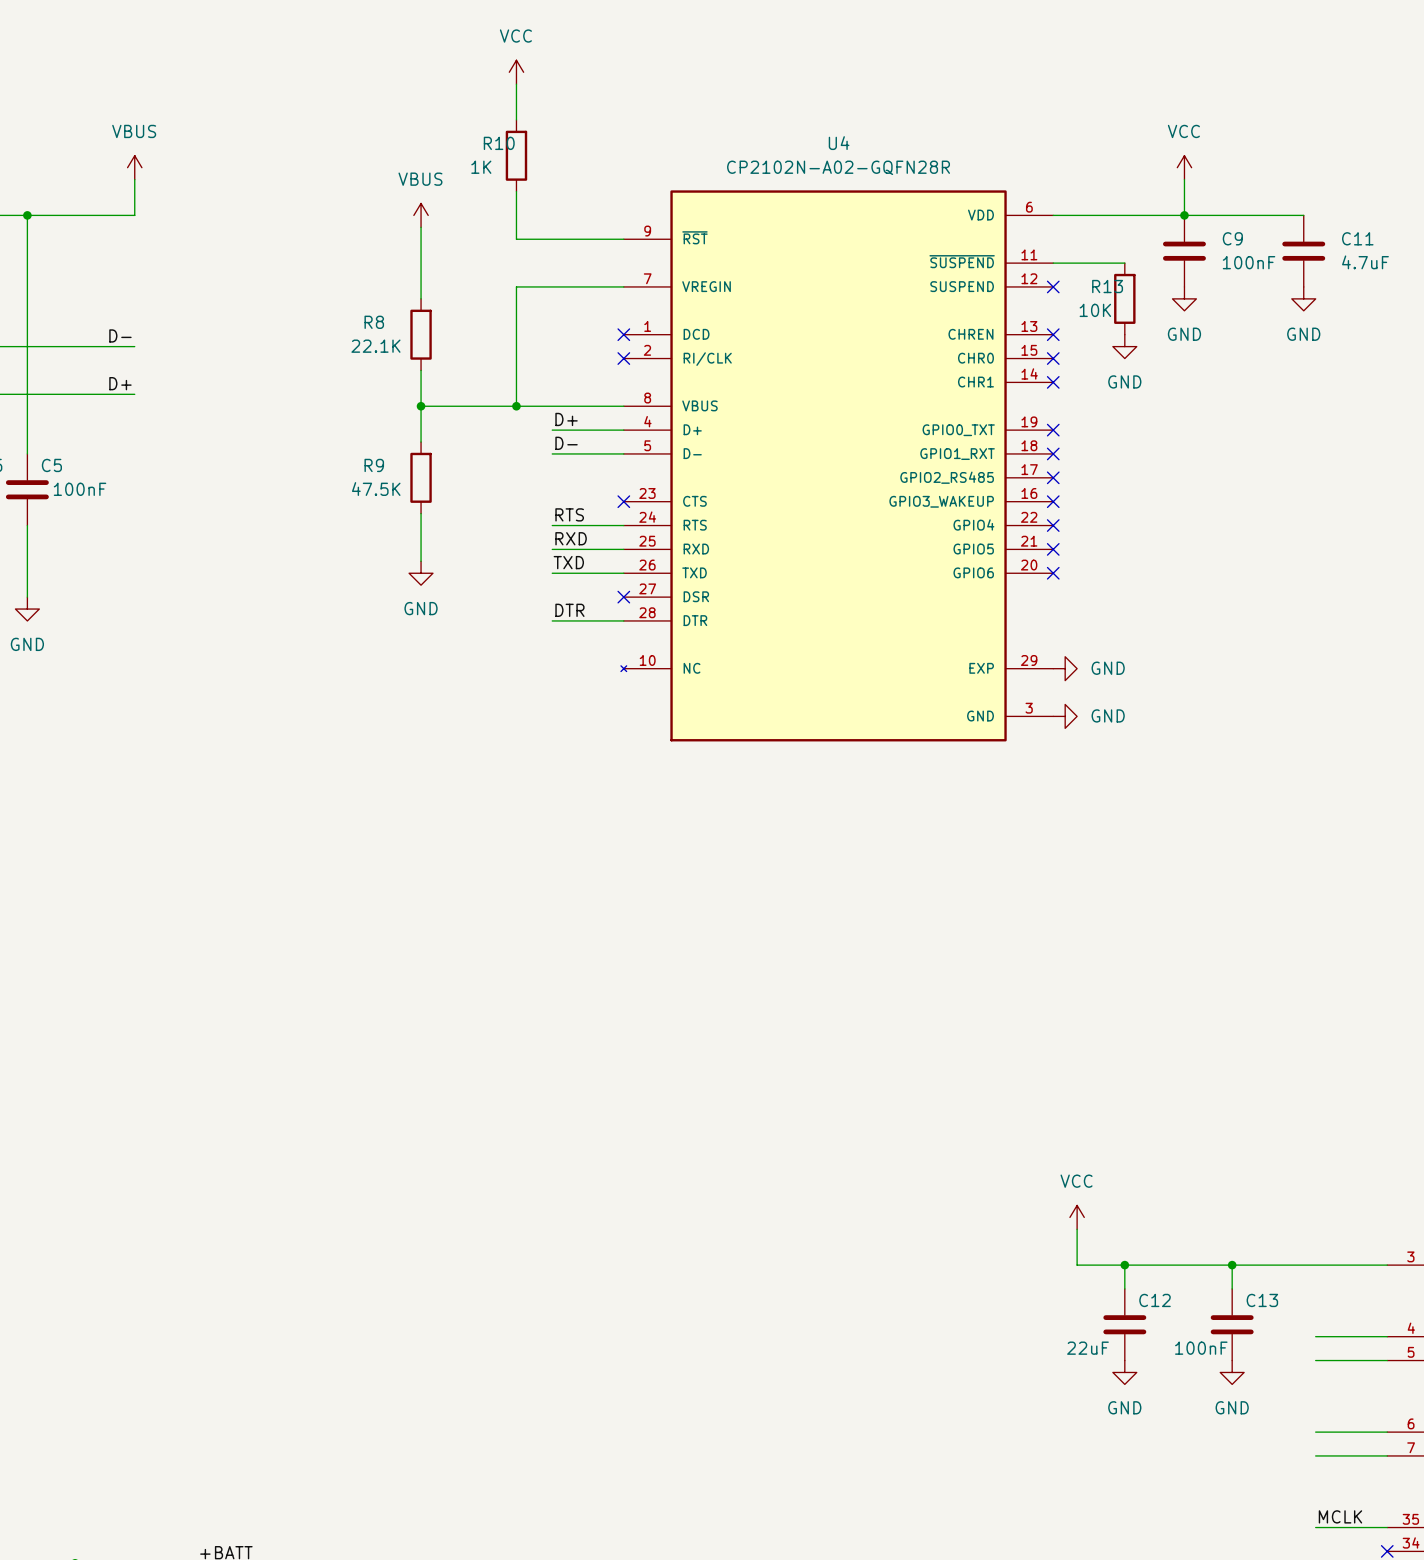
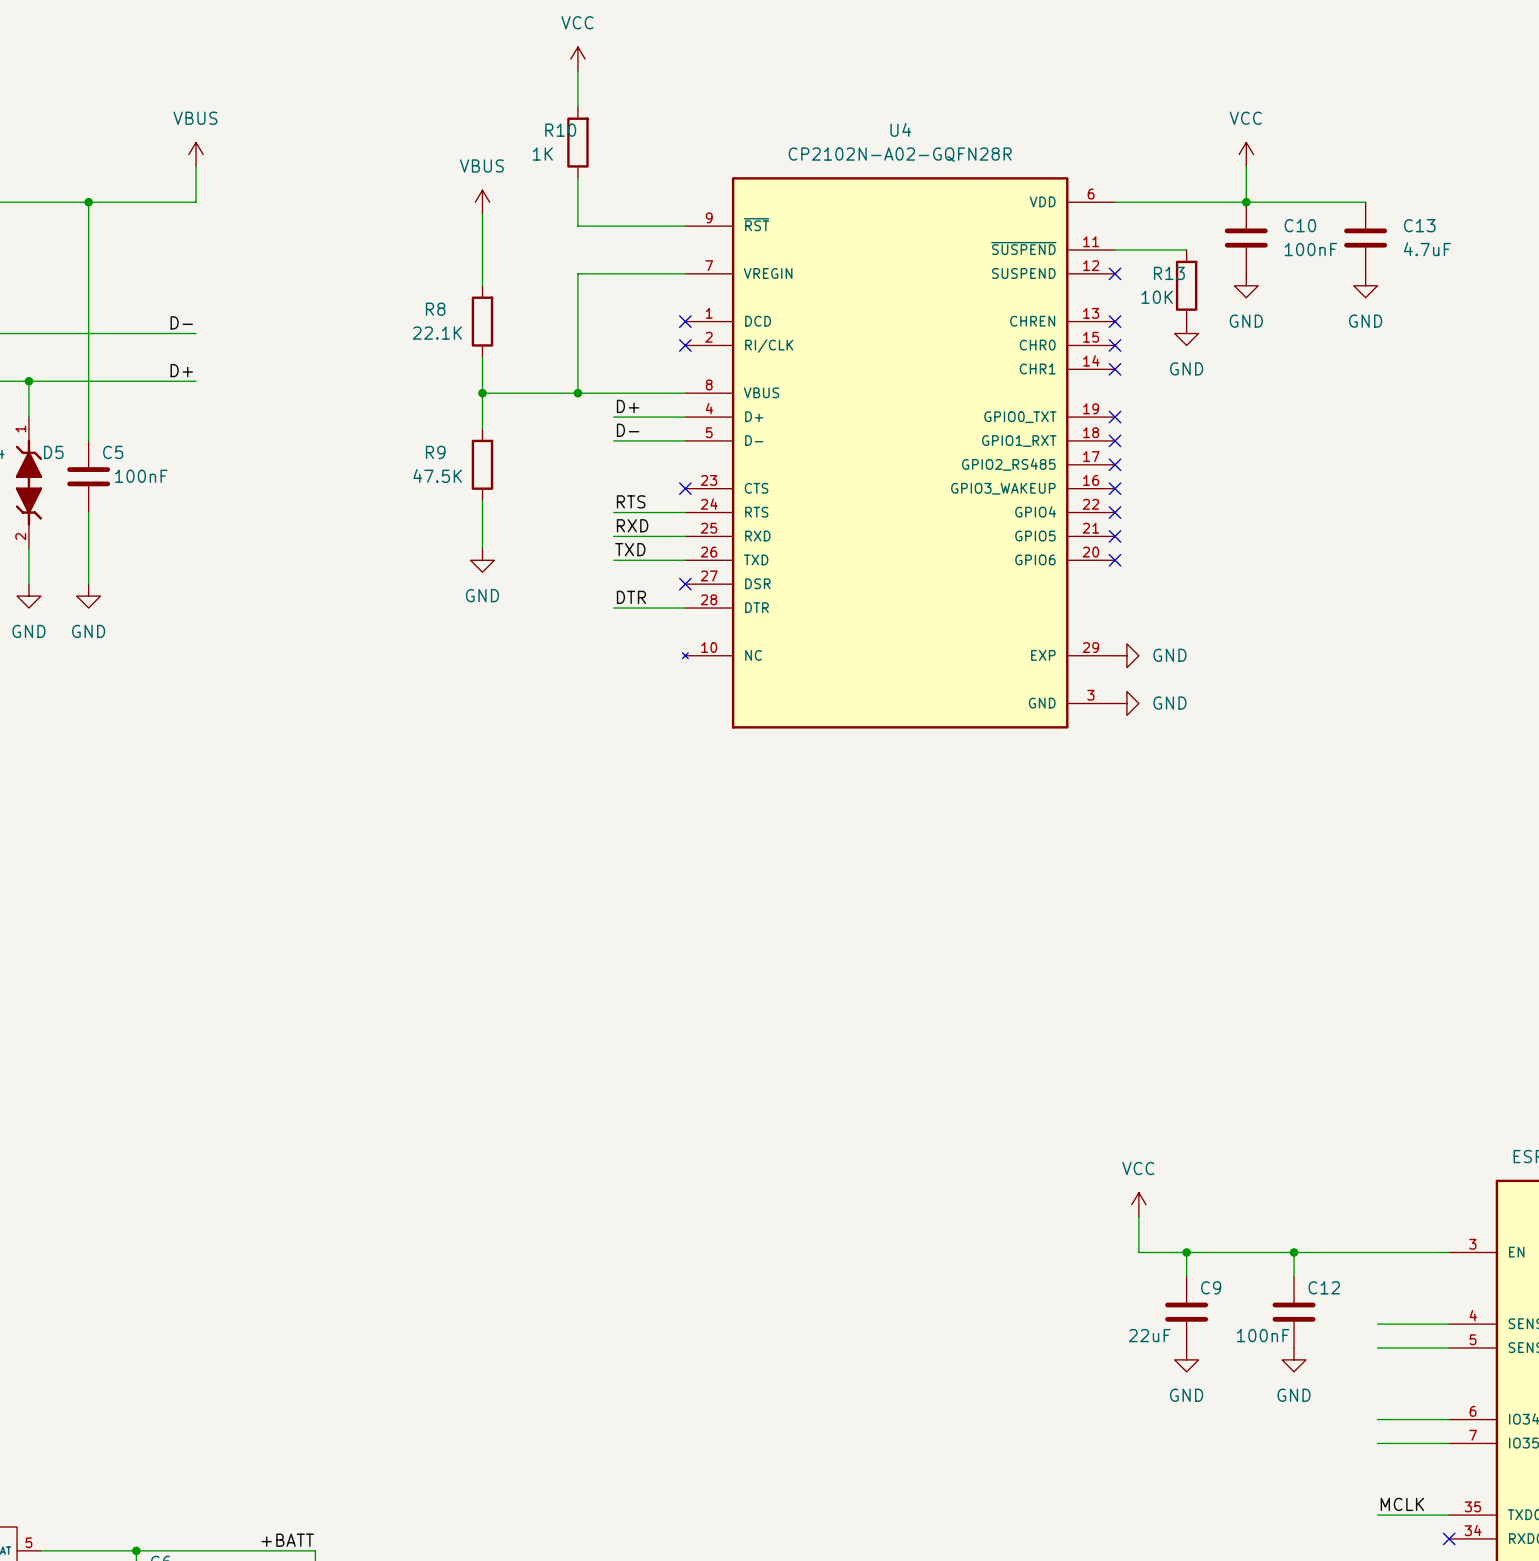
C9 name: C9 (1232, 238) -> C10 (1300, 225)
C11 name: C11 (1357, 238) -> C13 (1419, 225)
C12 name: C12 (1155, 1300) -> C9 (1211, 1287)
C13 name: C13 (1262, 1300) -> C12 (1324, 1287)

